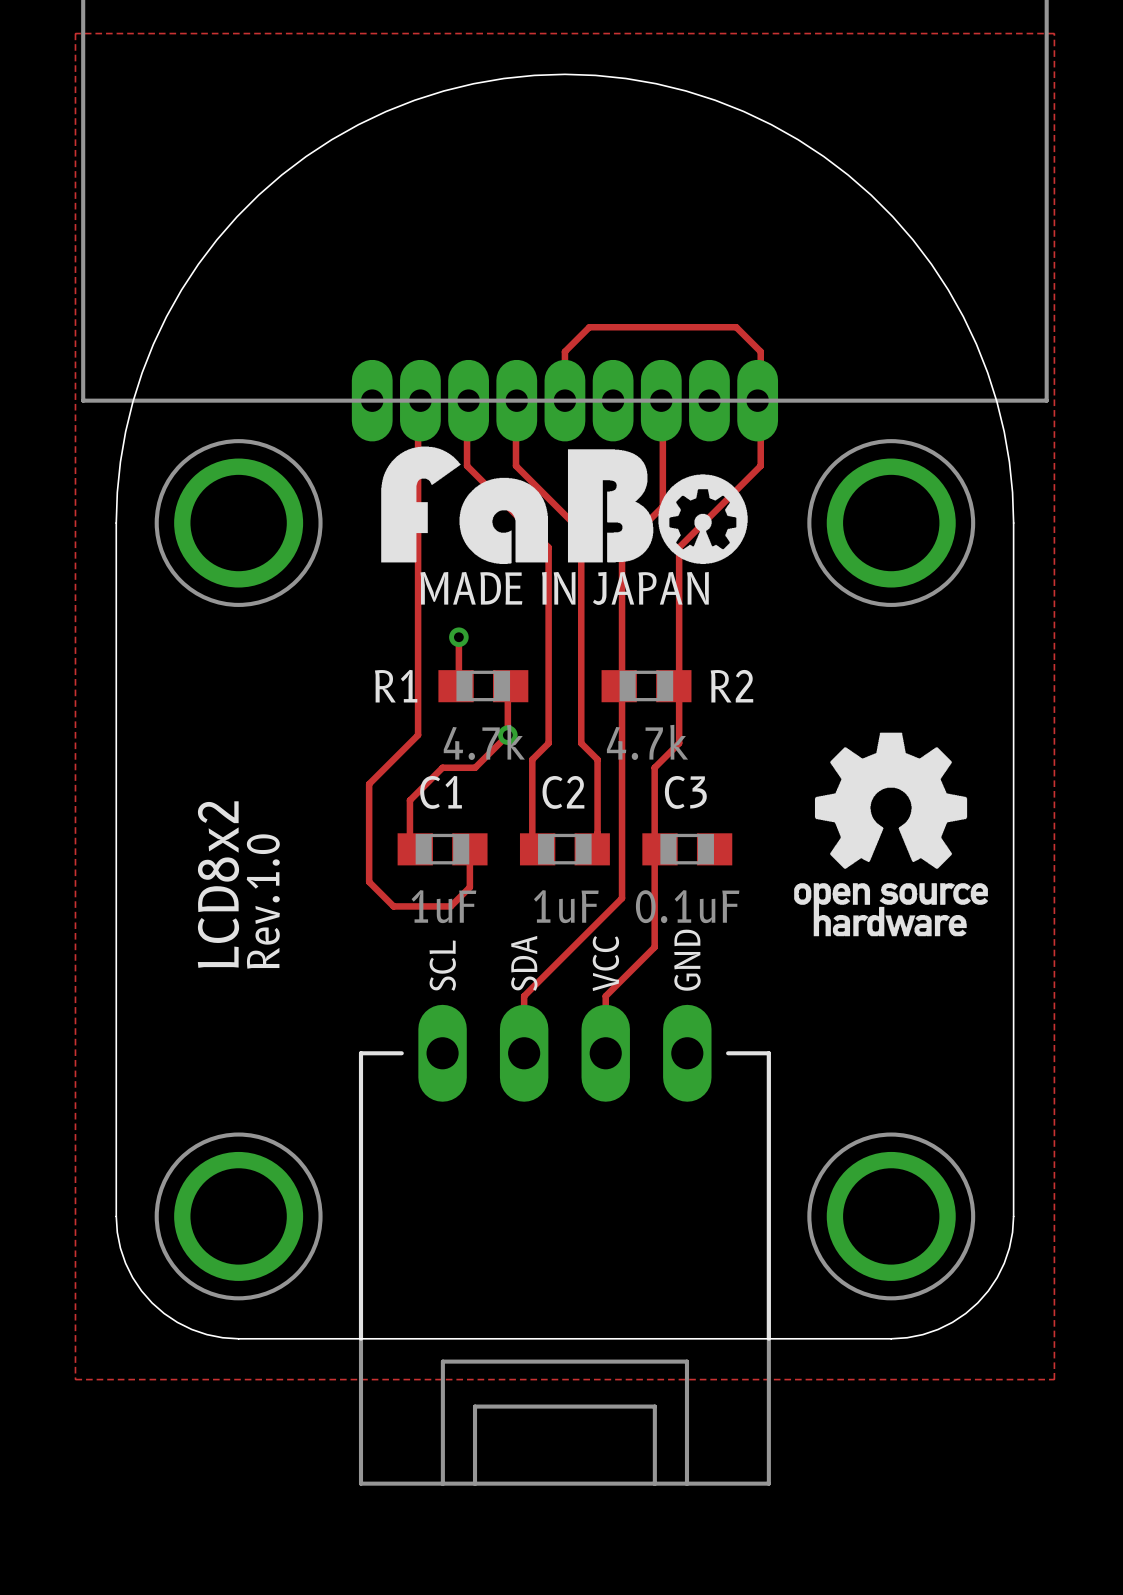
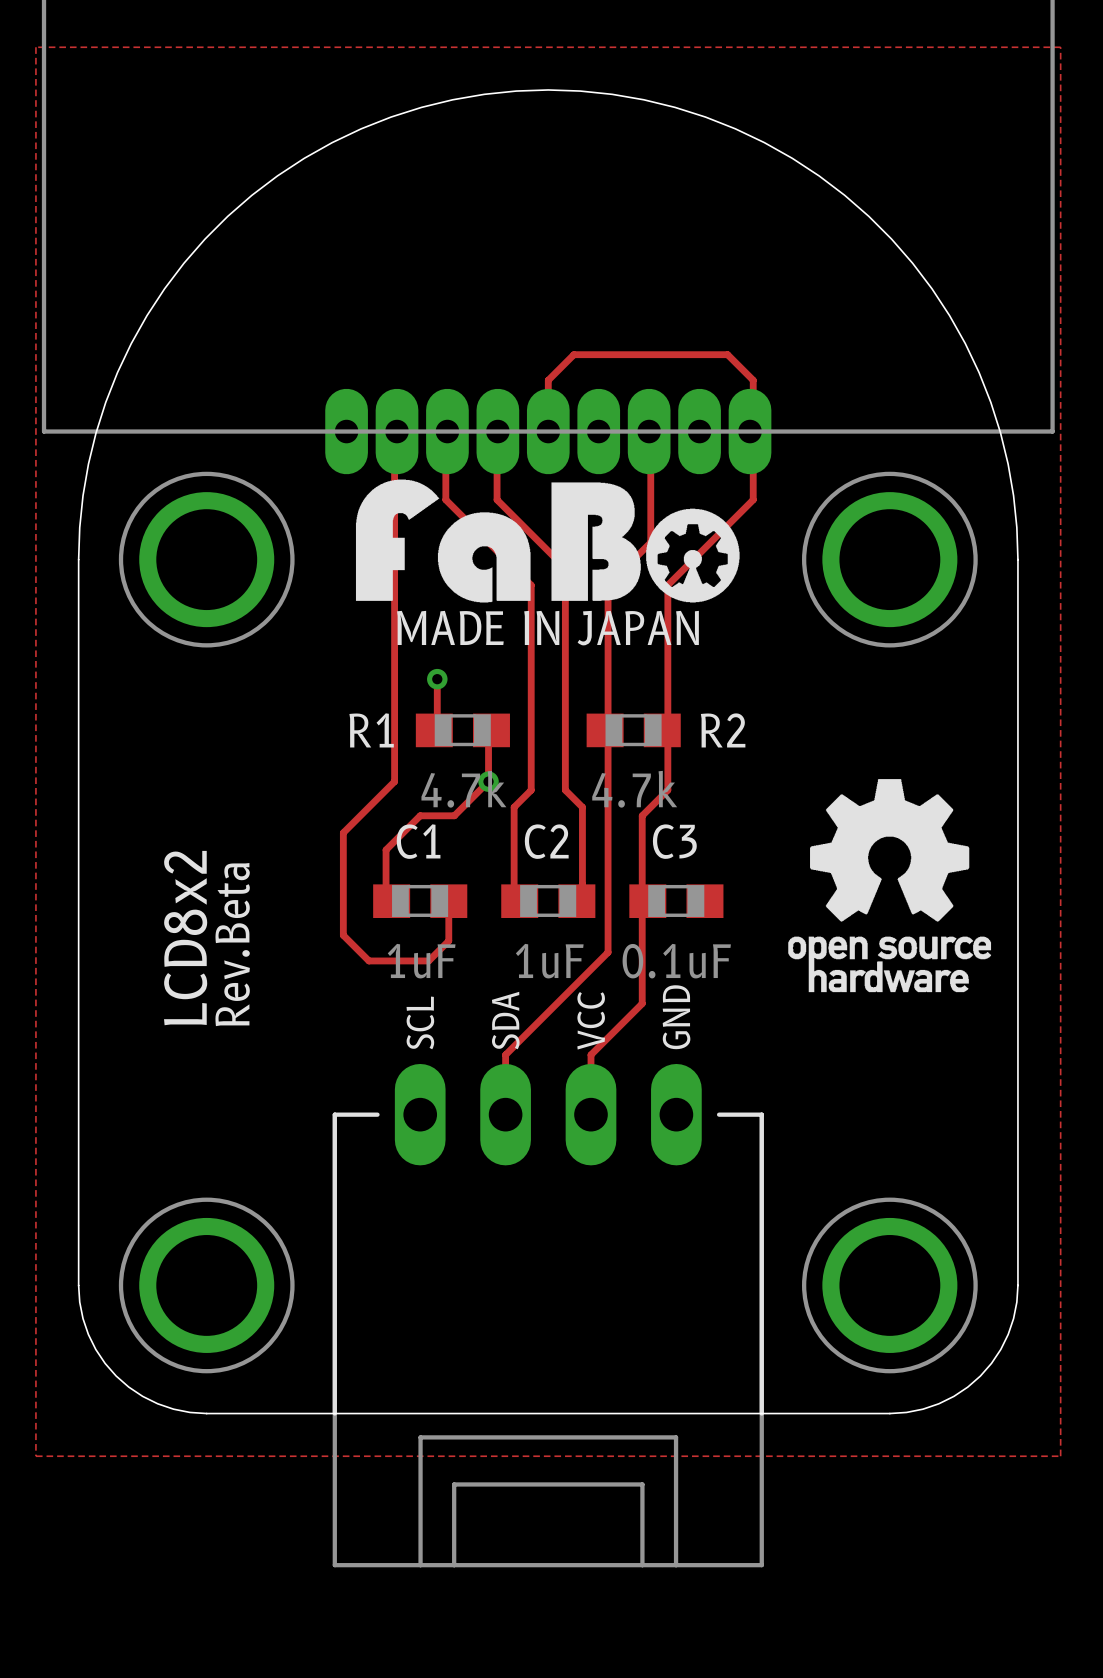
text: Rev.1.0 (263, 901) -> Rev.Beta (232, 944)

